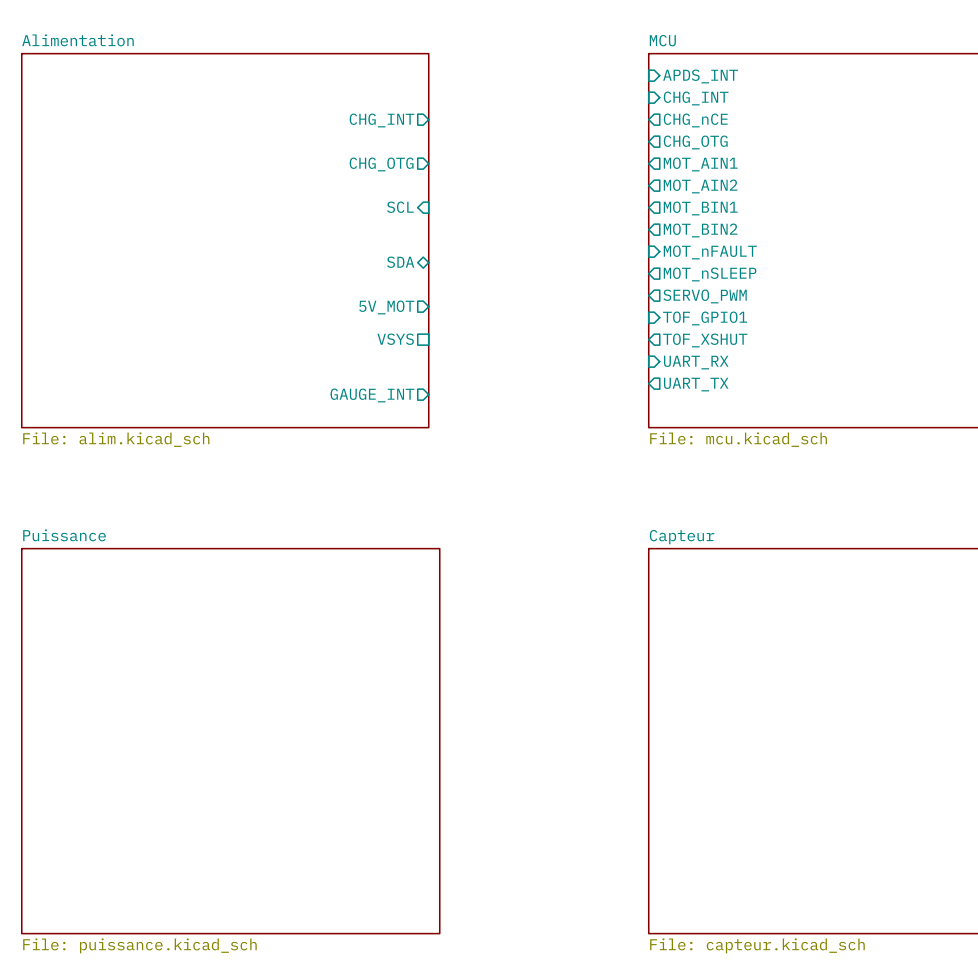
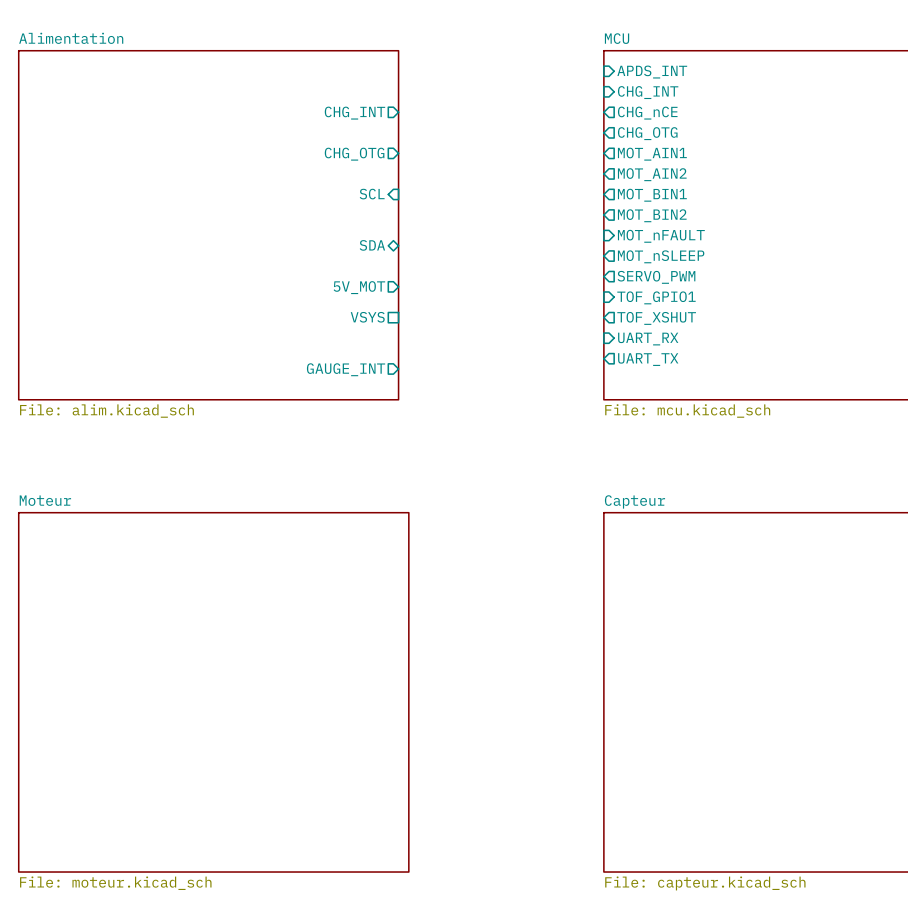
sheet Puissance name: Puissance (64, 535) -> Moteur (45, 500)
sheet Puissance value: File: puissance.kicad_sch (139, 945) -> File: moteur.kicad_sch (115, 883)

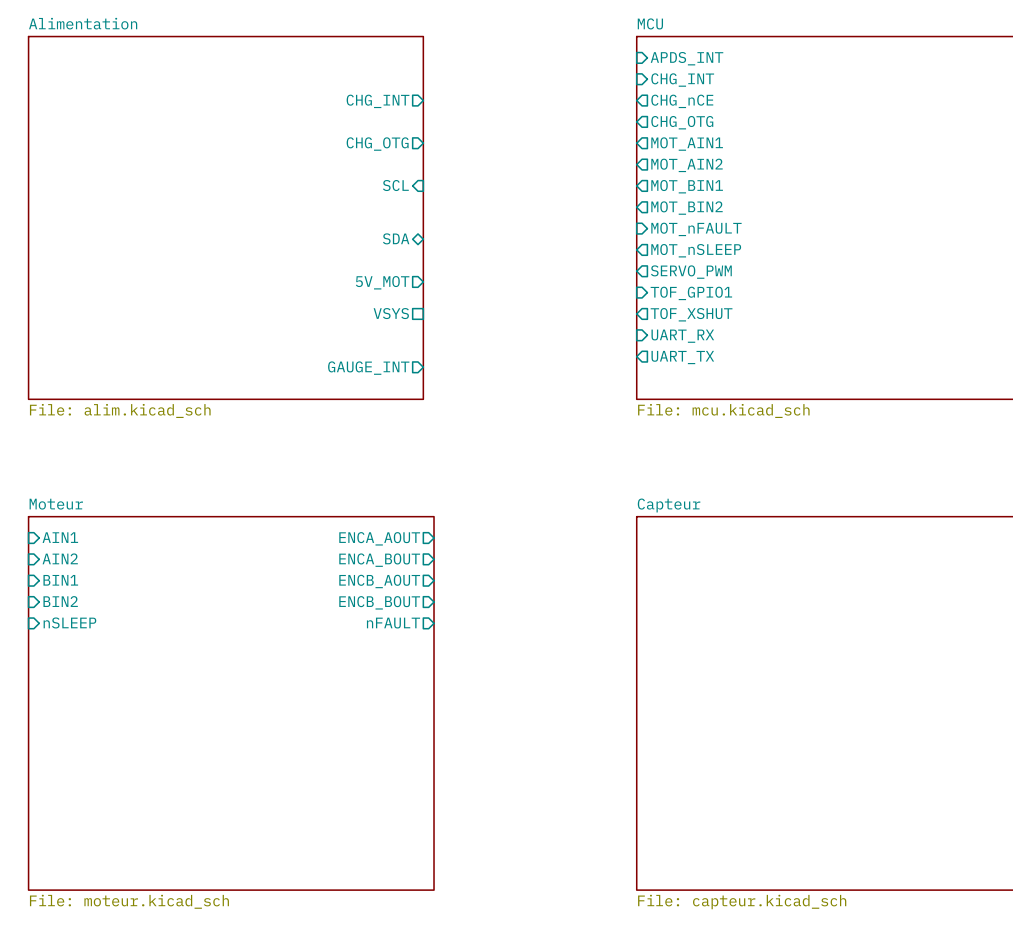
sheet pin: none -> AIN1 (60, 537)
sheet pin: none -> ENCA_AOUT (379, 538)
sheet pin: none -> AIN2 (60, 558)
sheet pin: none -> ENCA_BOUT (379, 560)
sheet pin: none -> BIN1 (60, 580)
sheet pin: none -> ENCB_AOUT (379, 581)
sheet pin: none -> BIN2 (60, 601)
sheet pin: none -> ENCB_BOUT (379, 602)
sheet pin: none -> nSLEEP (69, 622)
sheet pin: none -> nFAULT (393, 623)

